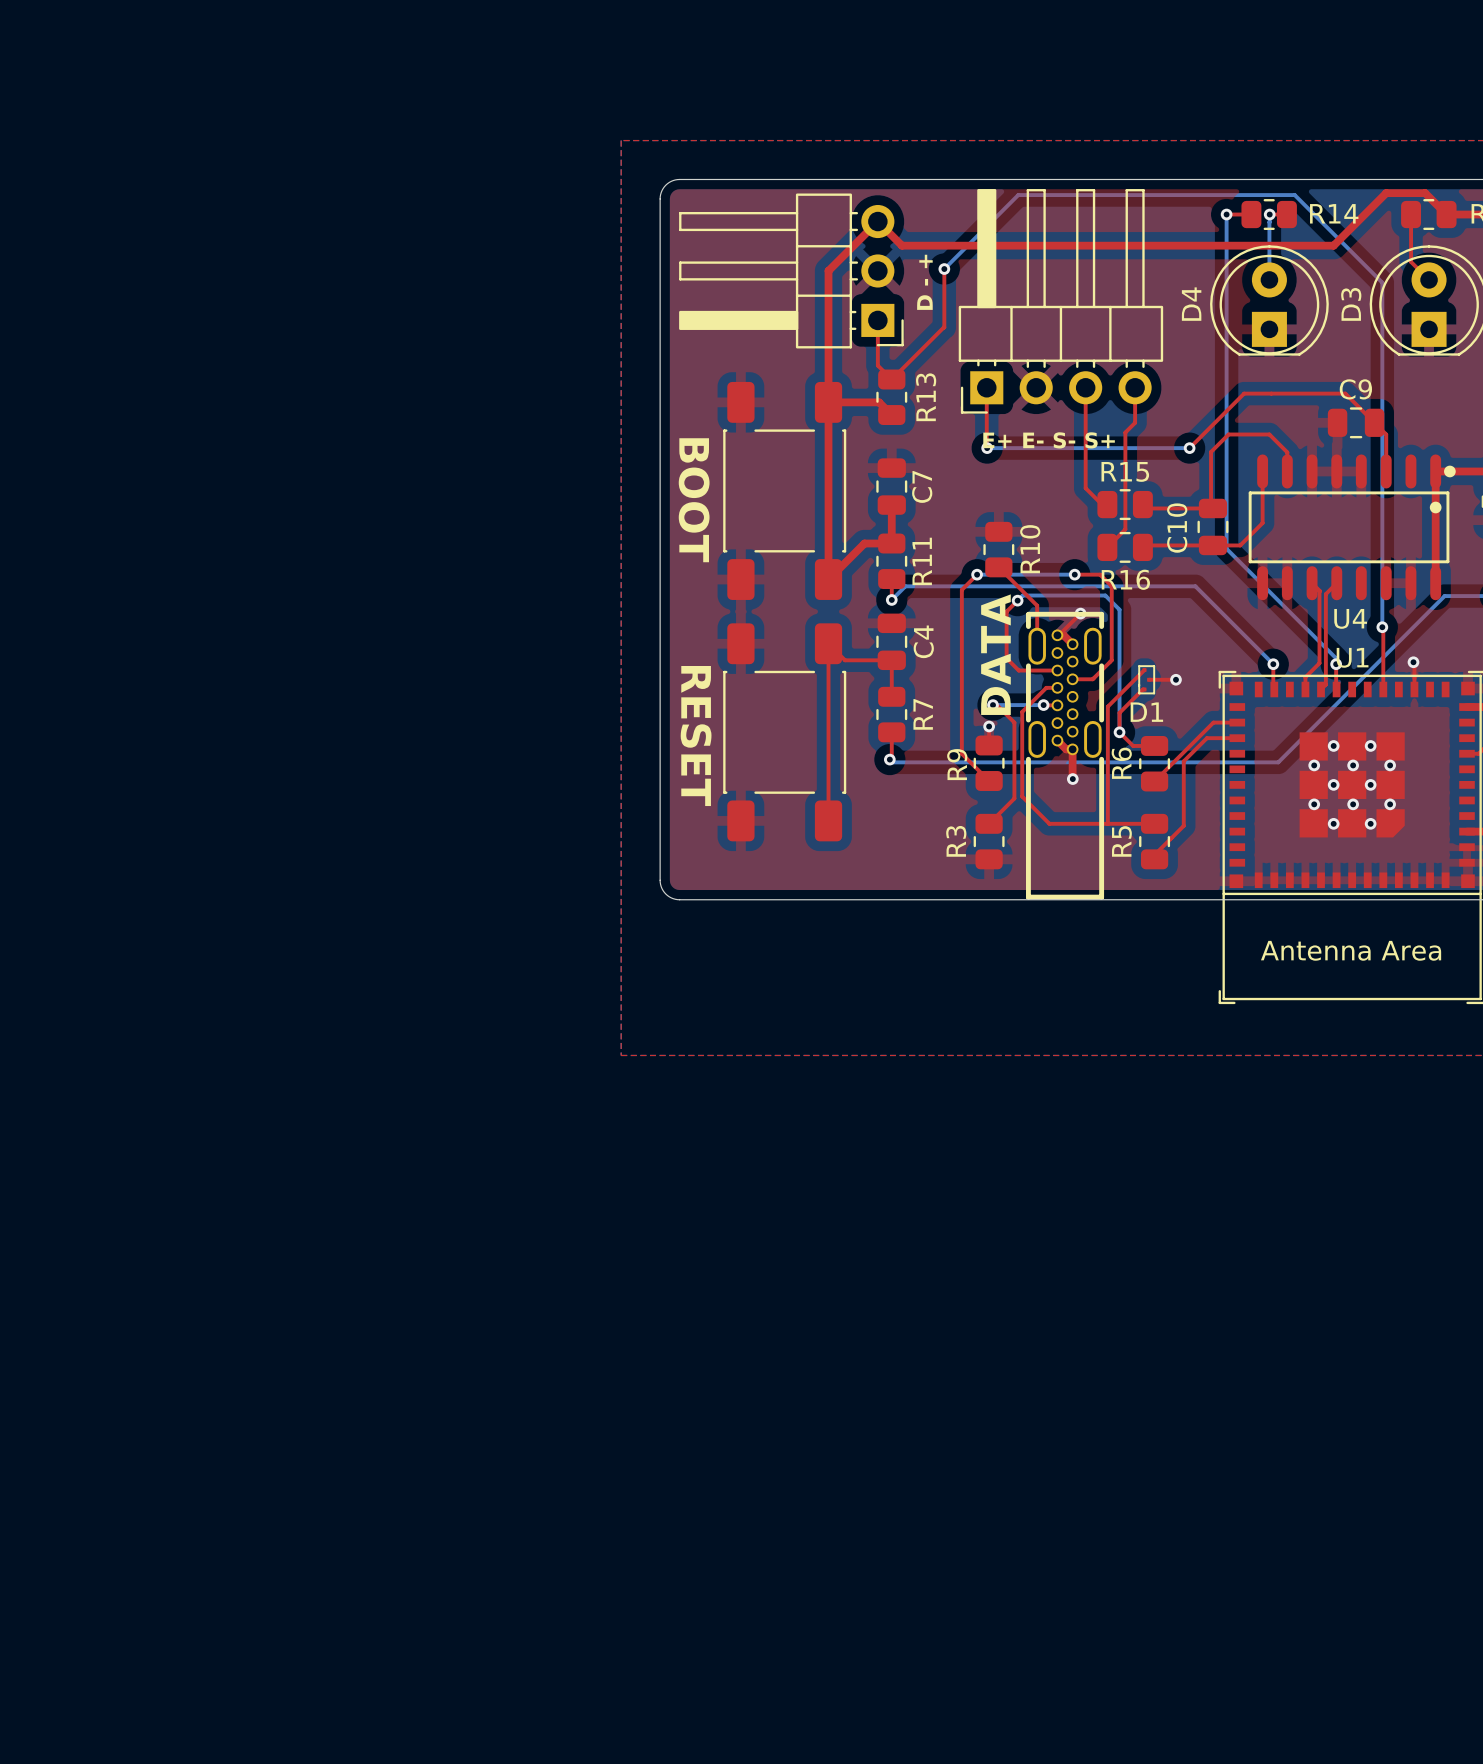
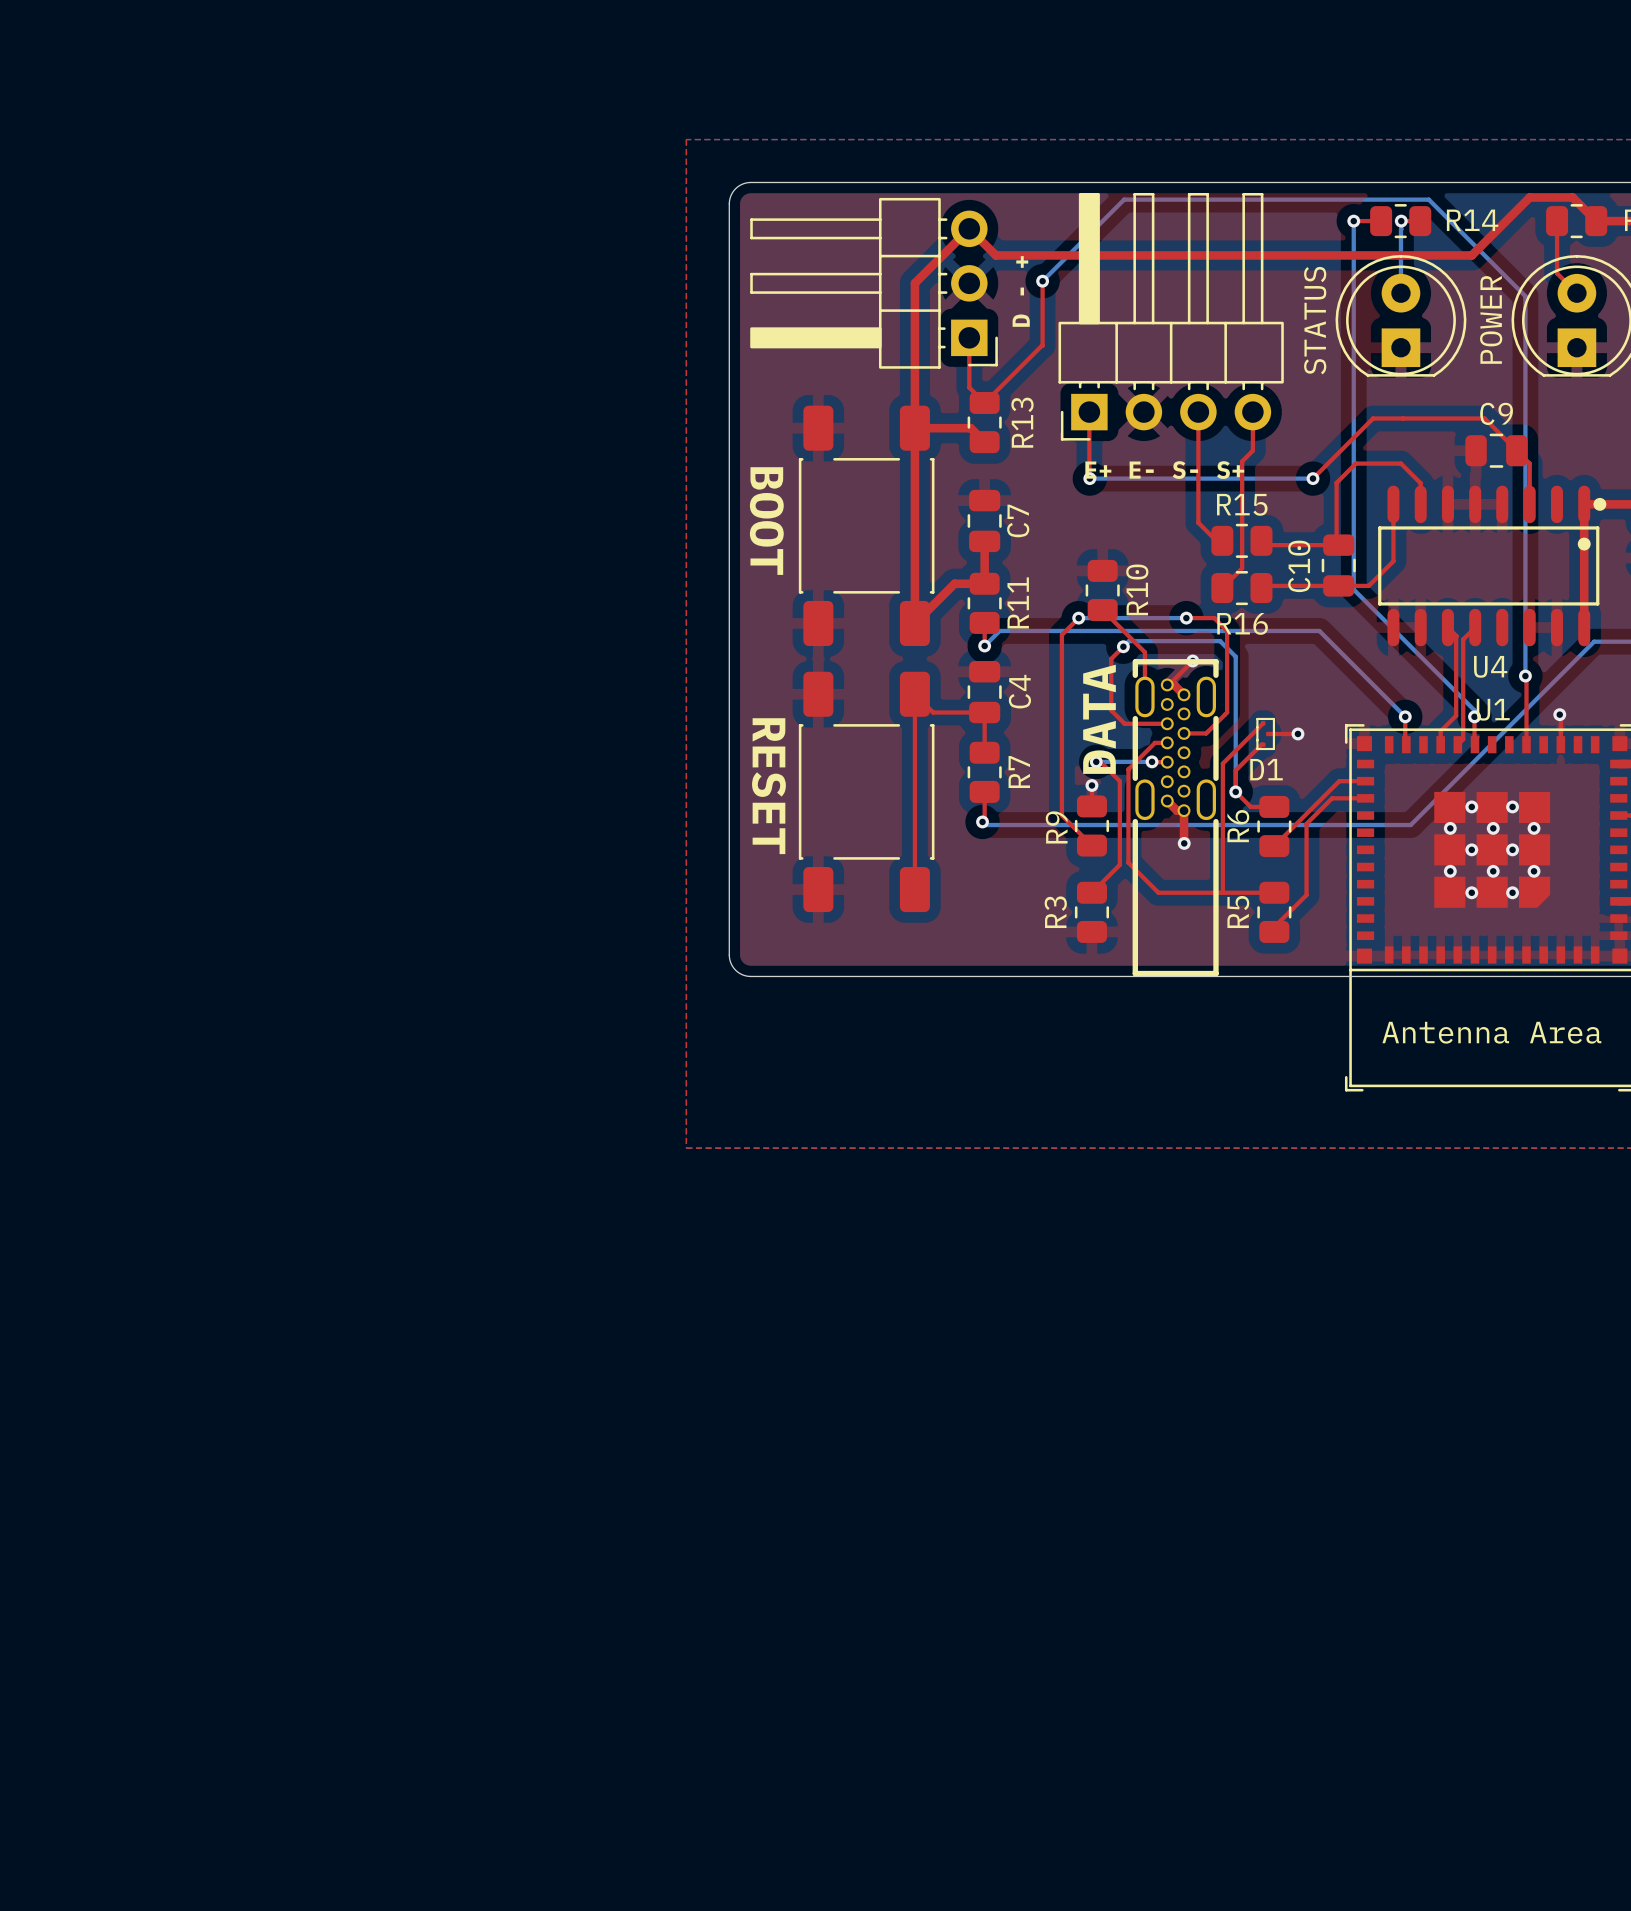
D4 name: D4 (1191, 304) -> STATUS (1315, 320)
D3 name: D3 (1351, 304) -> POWER (1491, 319)

